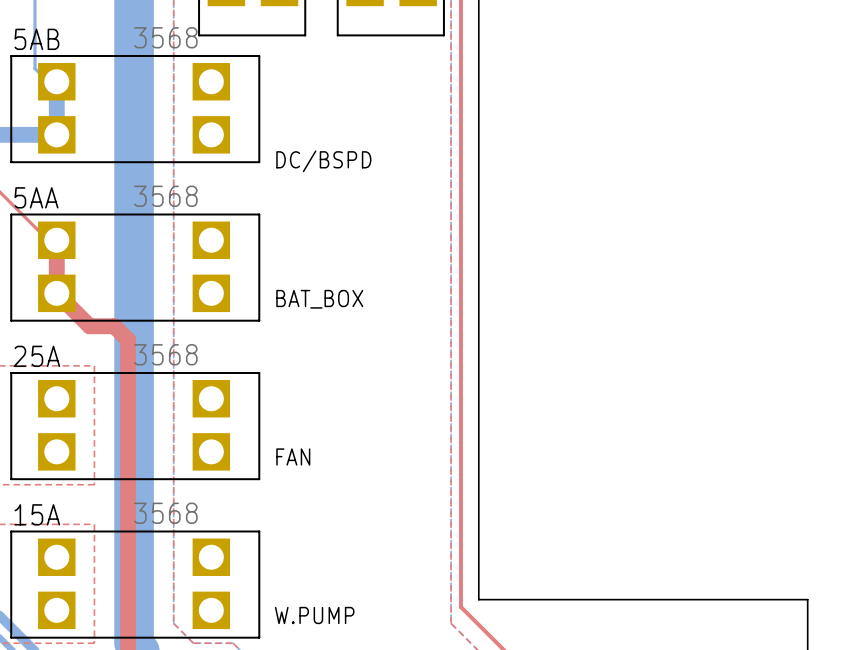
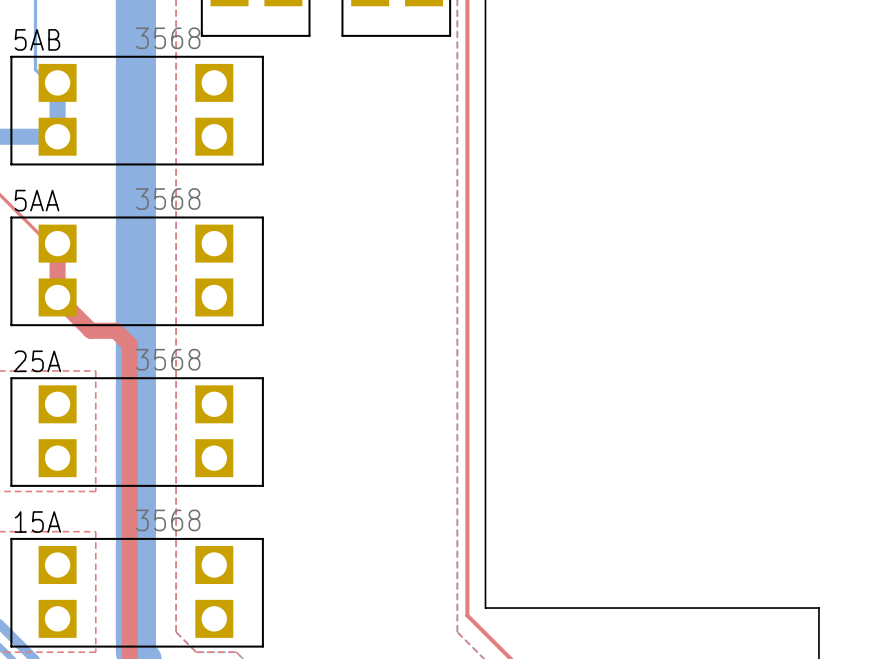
text: DC/BSPD (323, 161) -> none
text: BAT_BOX (319, 299) -> none
text: FAN (293, 457) -> none
text: W.PUMP (314, 615) -> none

